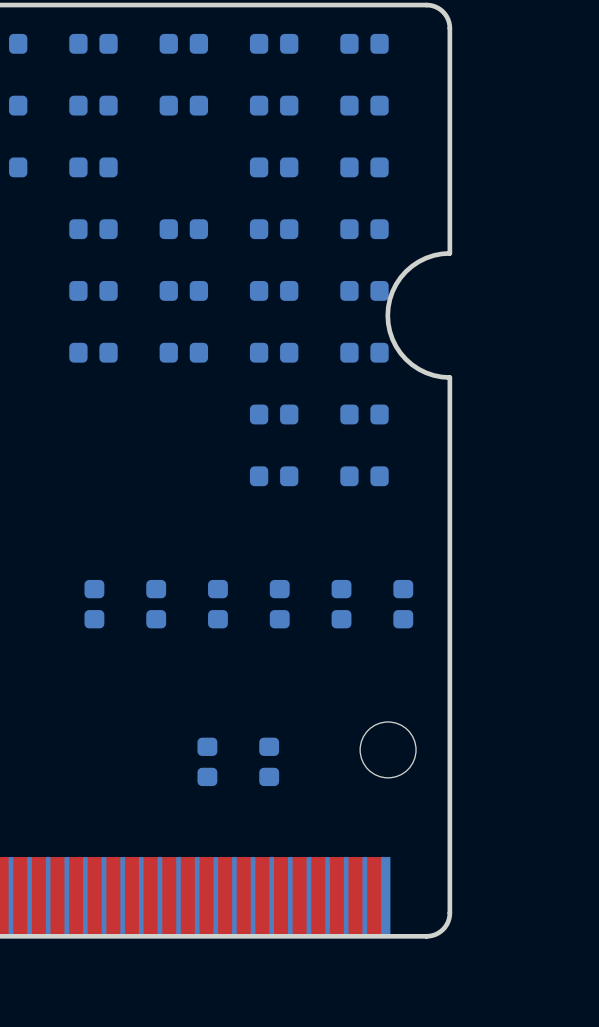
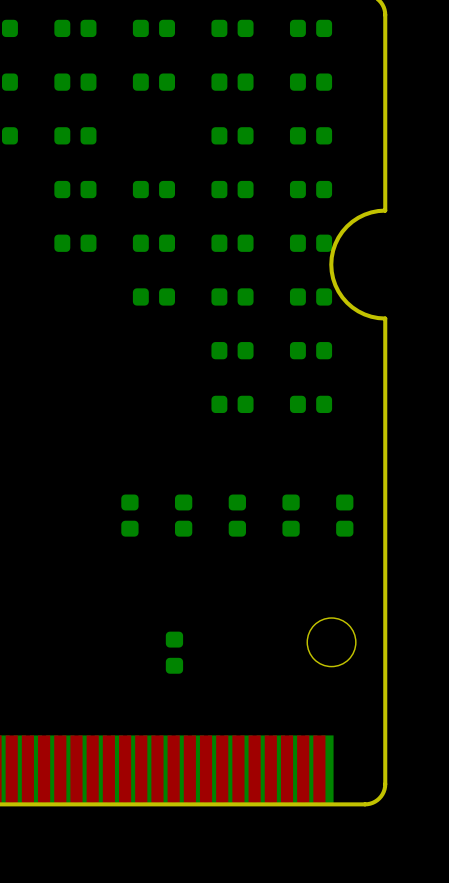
part: (93, 352) -> none
part: (94, 604) -> none
part: (269, 761) -> none

